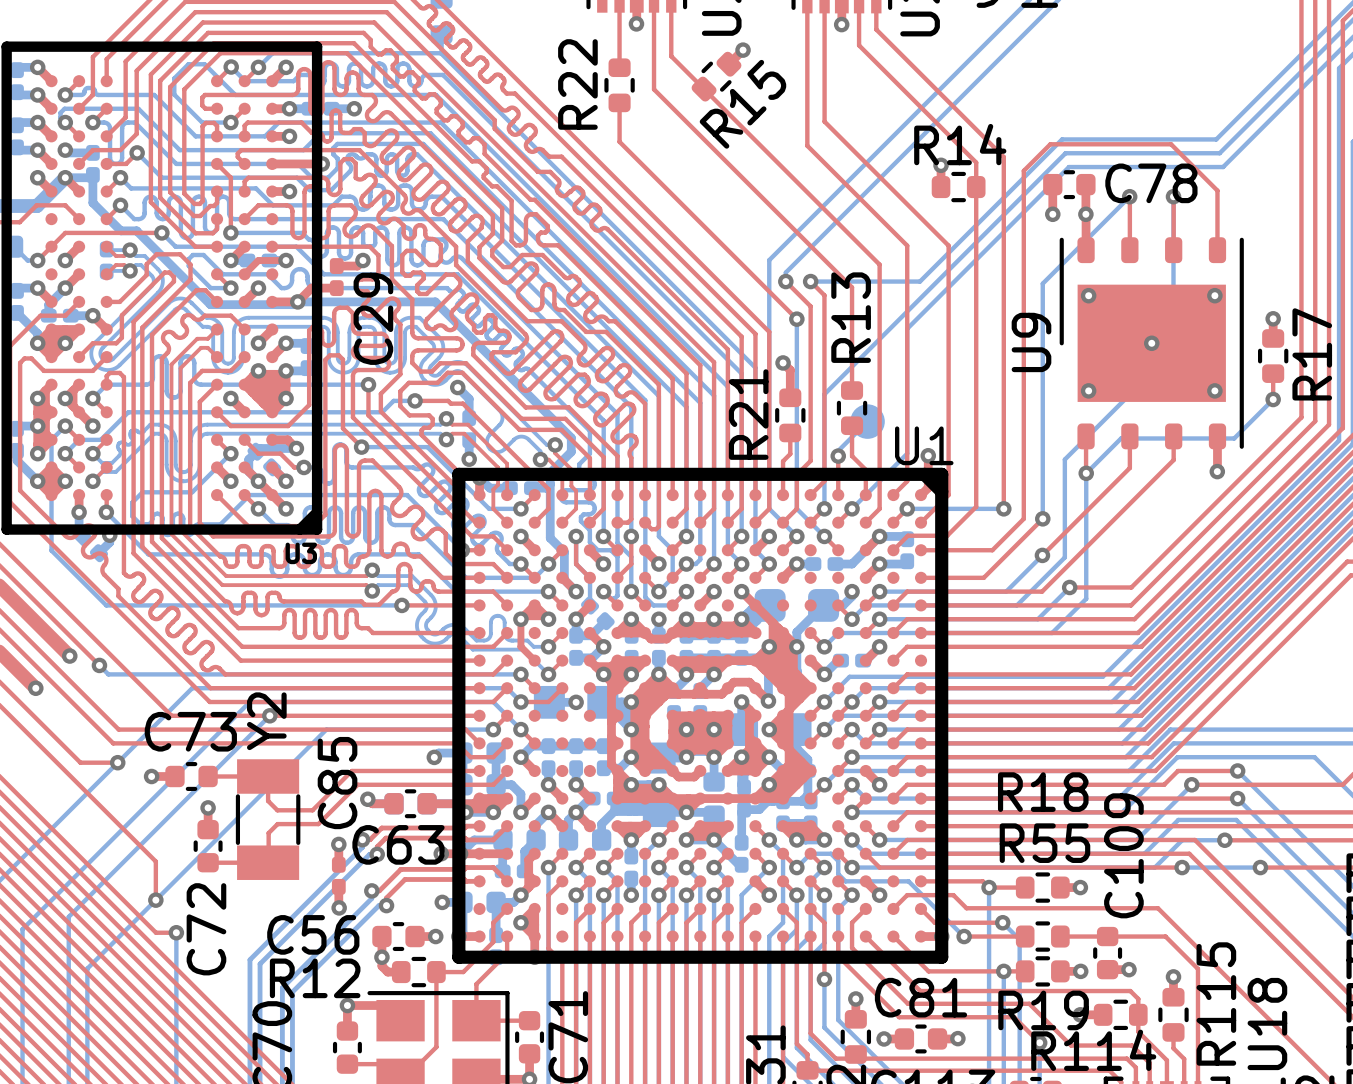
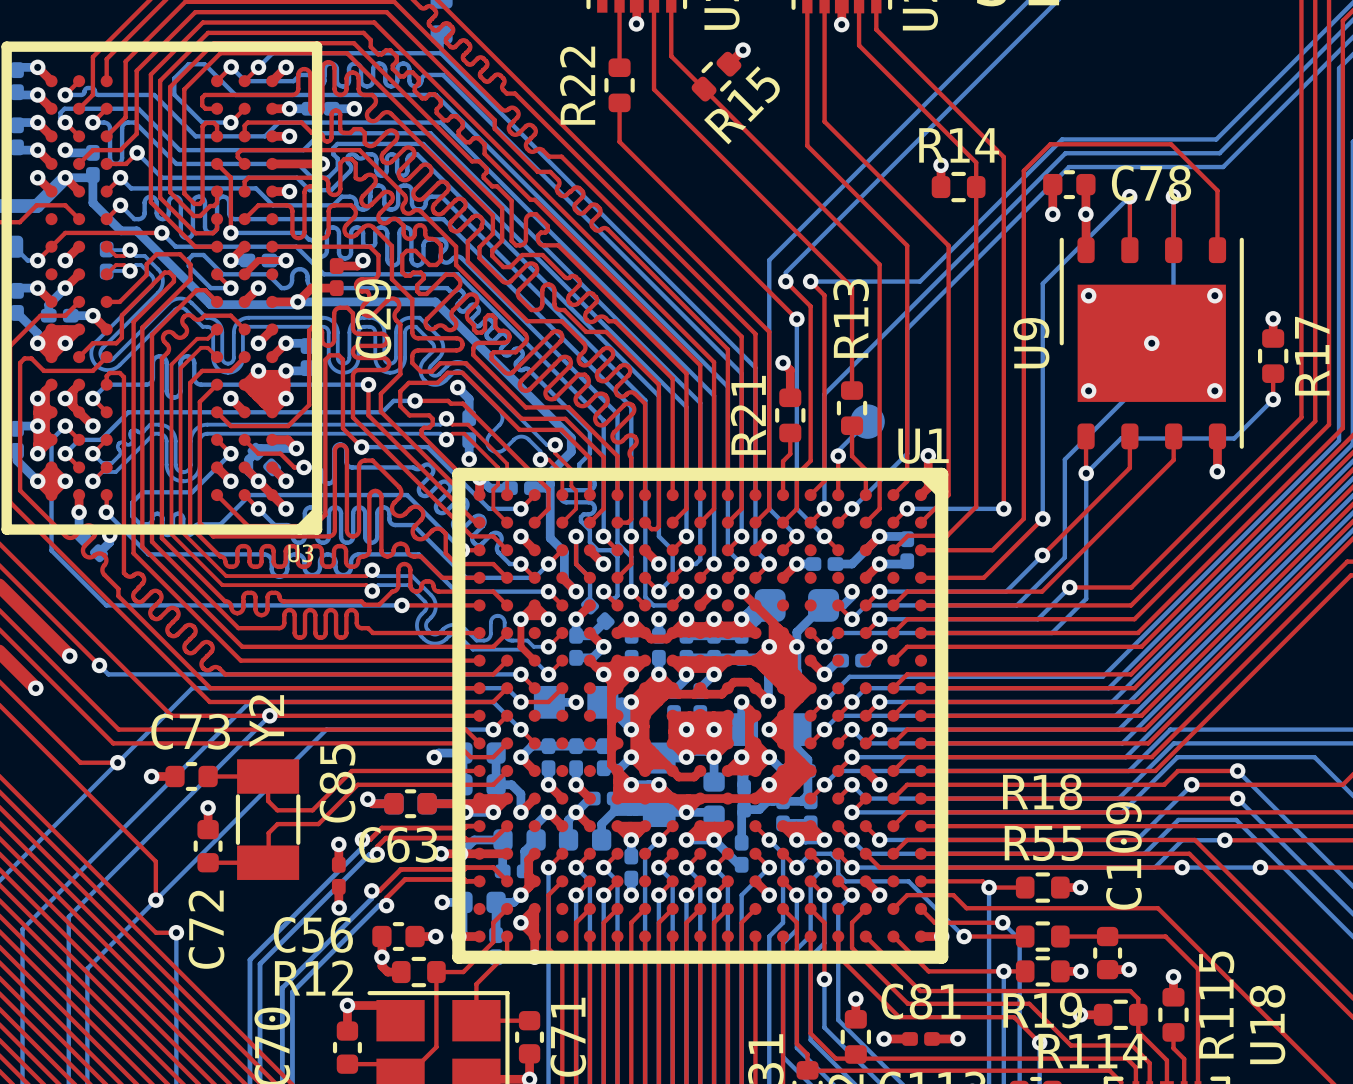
C81 footprint: [894, 1024, 948, 1054] -> [902, 1032, 940, 1046]

